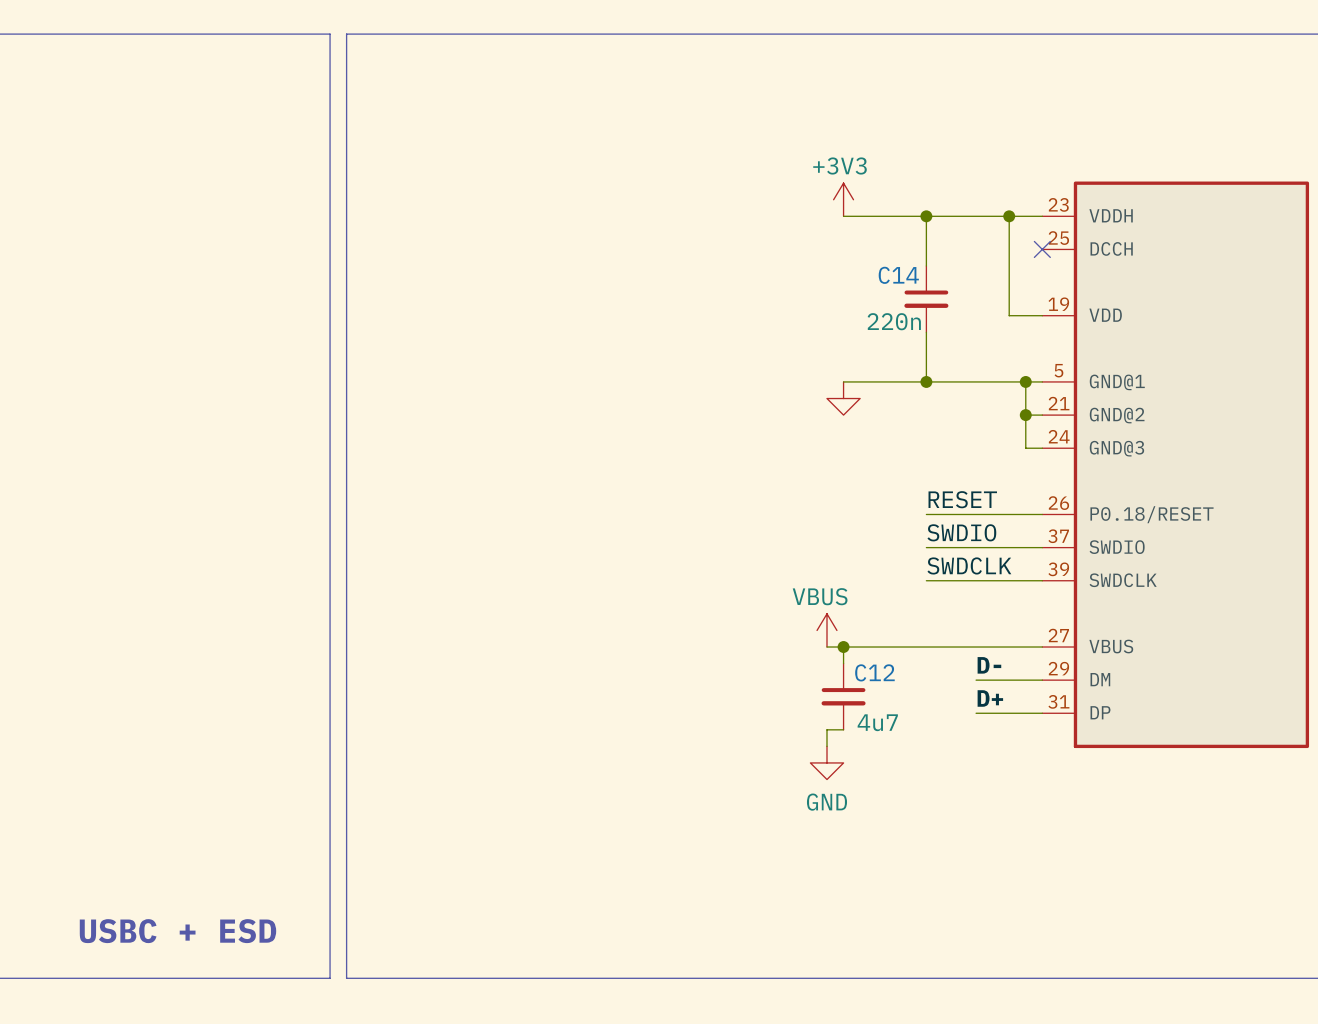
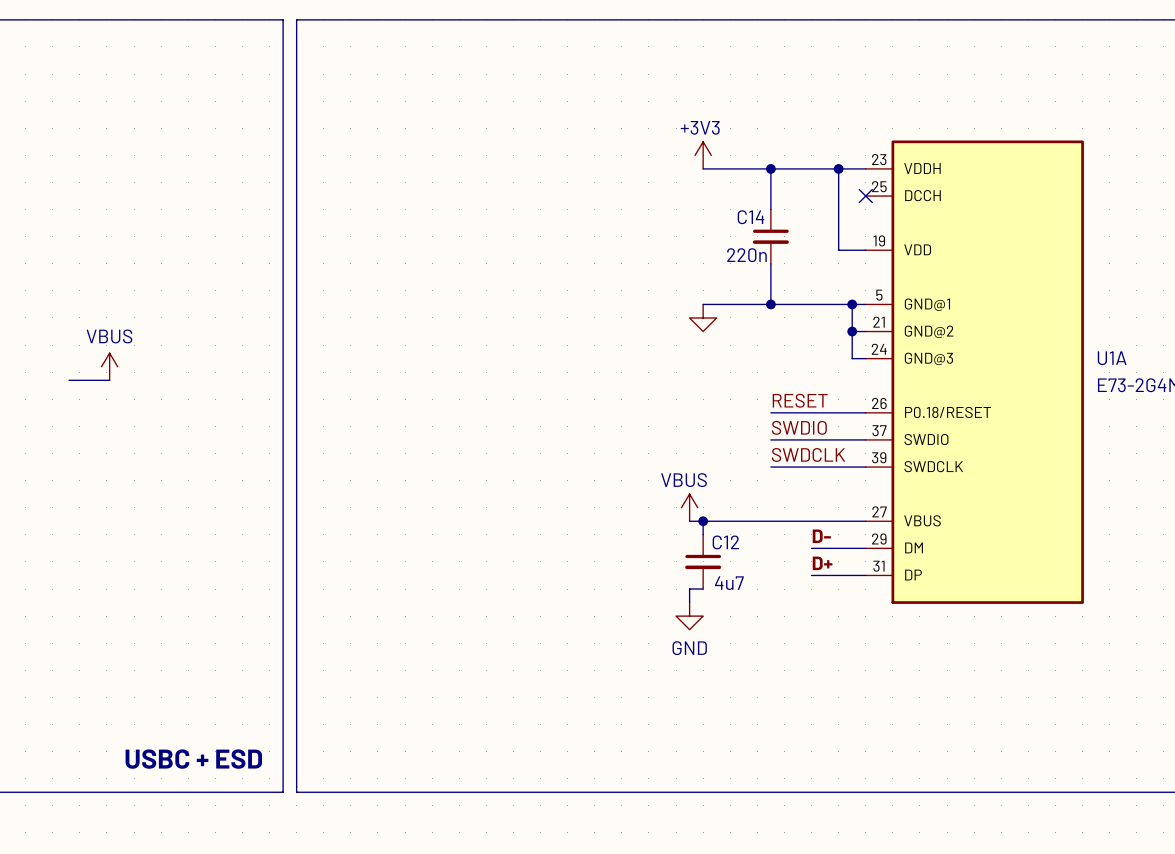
power symbol: none -> VBUS (109, 366)
wire: none -> (68, 380) (109, 380)
text position: USBC + ESD (177, 931) -> USBC + ESD (193, 759)

